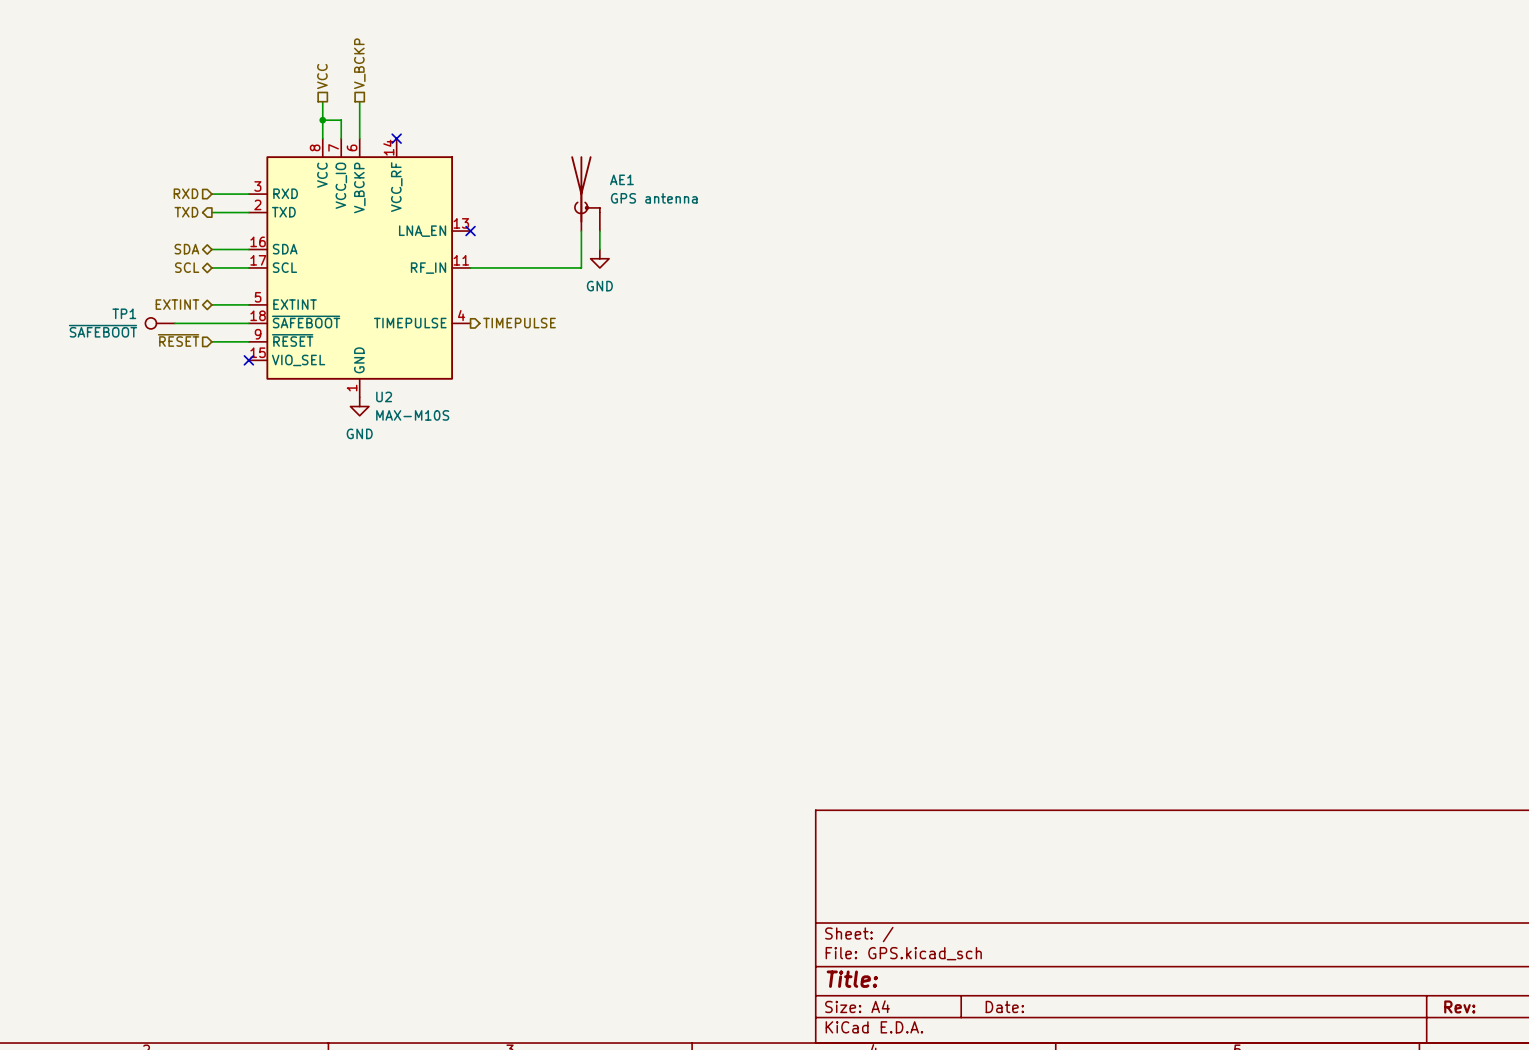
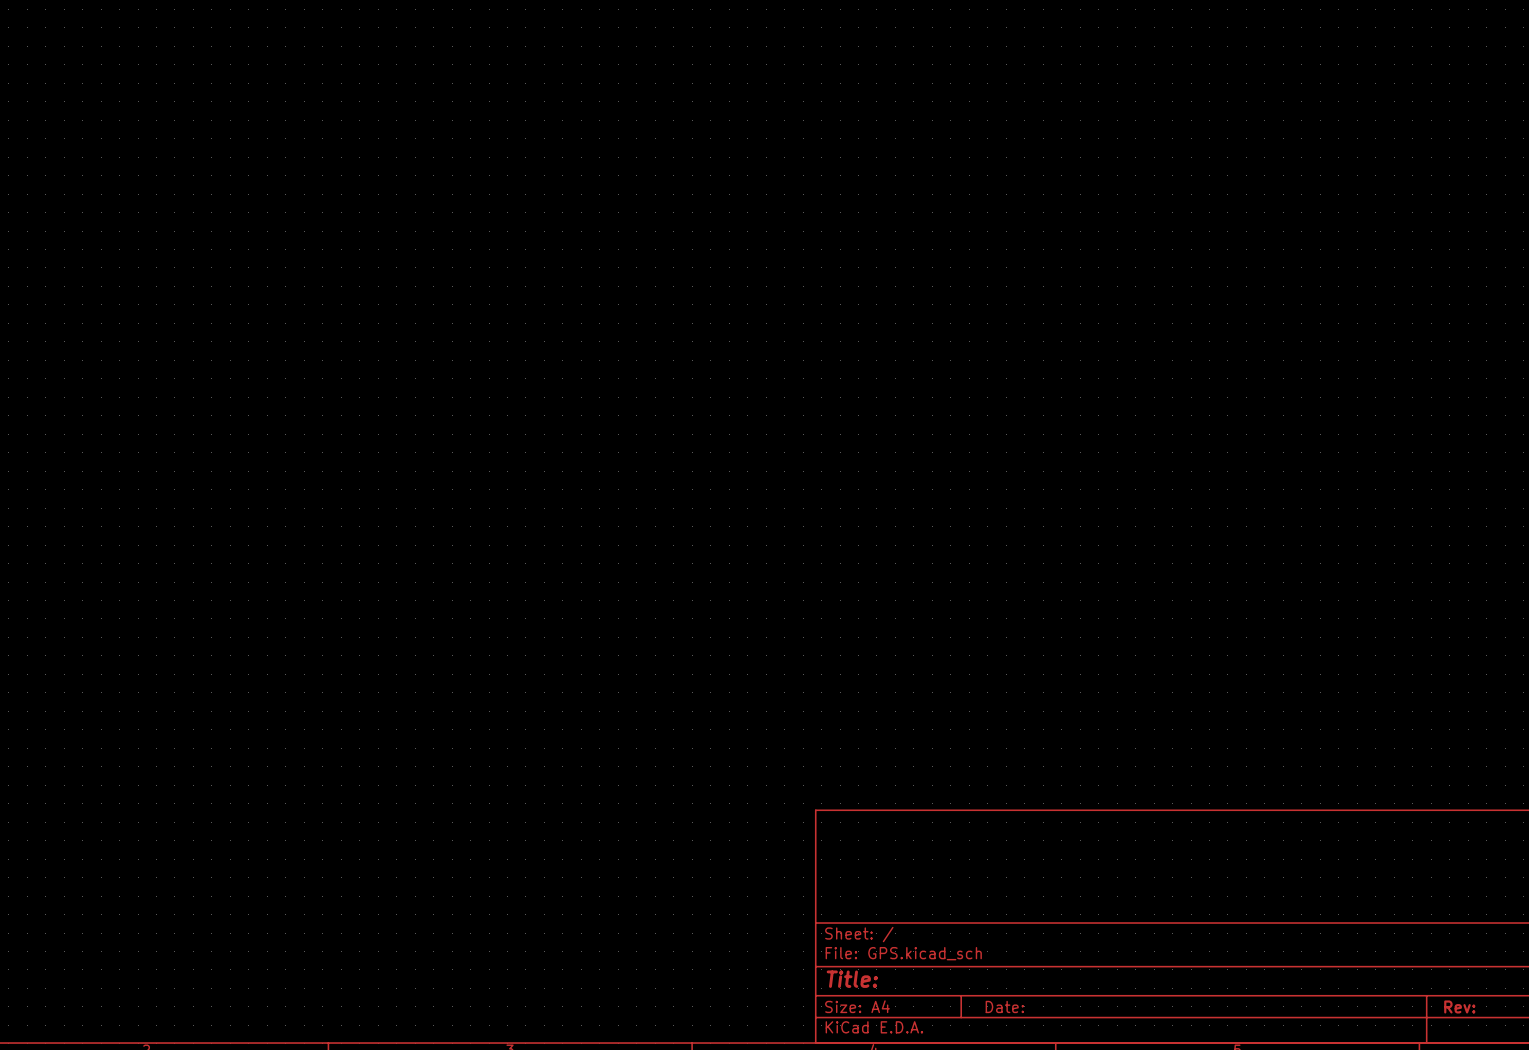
hierarchical label: V_BCKP (359, 63) -> none
hierarchical label: VCC (322, 76) -> none
wire: (322, 101) (322, 138) -> none
wire: (359, 101) (359, 138) -> none
wire: (322, 120) (341, 120) (341, 138) -> none
junction: (322, 120) -> none
no-connect mark: (396, 138) -> none
hierarchical label: RXD (186, 193) -> none
AE1: GPS antenna (585, 193) -> none
wire: (211, 194) (248, 194) -> none
hierarchical label: TXD (186, 212) -> none
wire: (211, 212) (248, 212) -> none
no-connect mark: (470, 231) -> none
wire: (581, 231) (581, 267) (470, 267) -> none
wire: (599, 231) (599, 249) -> none
hierarchical label: SDA (186, 249) -> none
wire: (211, 249) (248, 249) -> none
power symbol: GND (599, 258) -> none
hierarchical label: SCL (187, 267) -> none
wire: (211, 267) (248, 267) -> none
U2: MAX-M10S (359, 267) -> none
hierarchical label: EXTINT (177, 304) -> none
wire: (211, 304) (248, 304) -> none
TP1: ~{SAFEBOOT} (160, 323) -> none
wire: (174, 323) (248, 323) -> none
hierarchical label: TIMEPULSE (519, 323) -> none
hierarchical label: ~{RESET} (178, 340) -> none
wire: (211, 341) (248, 341) -> none
no-connect mark: (248, 360) -> none
power symbol: GND (359, 406) -> none

